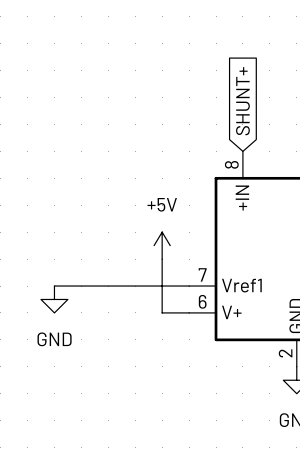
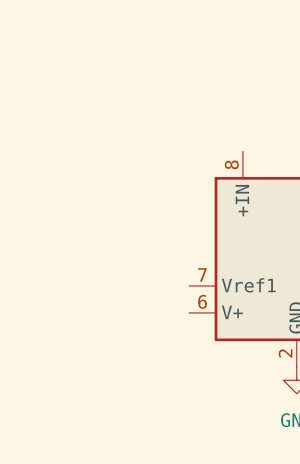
global label: SHUNT+ (242, 101) -> none
power symbol: +5V (162, 245) -> none
wire: (162, 259) (162, 312) (189, 312) -> none
wire: (54, 286) (189, 286) -> none
power symbol: GND (54, 299) -> none

